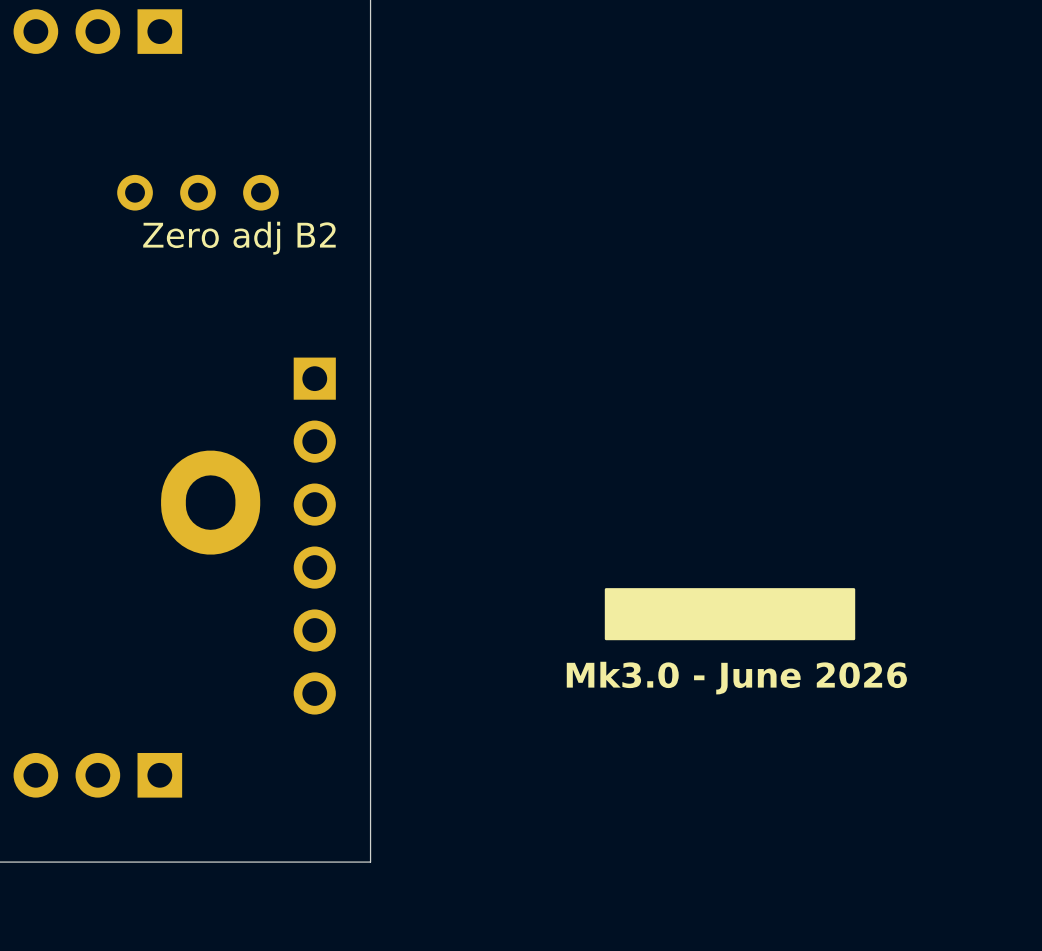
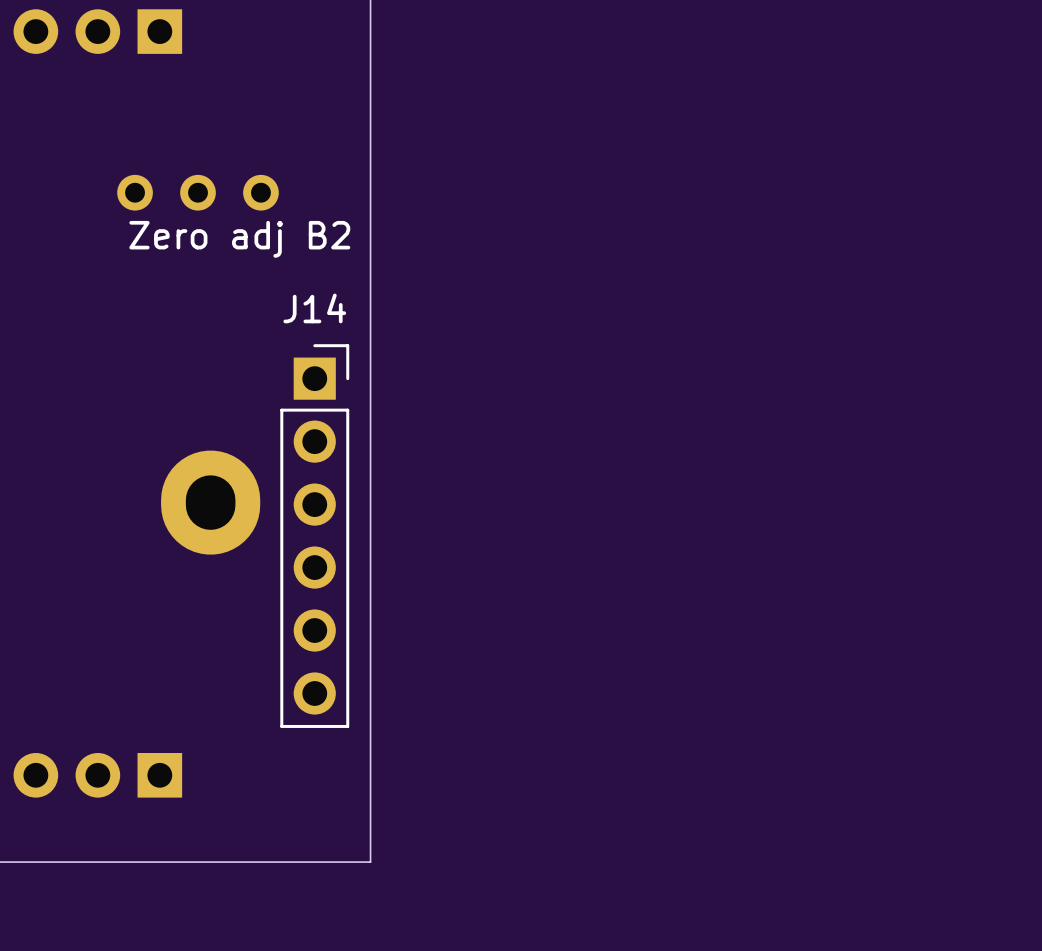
J14 side: top (314, 536) -> bottom (314, 536)
drawing: [604, 588, 856, 641] -> none
text: Mk3.0 - June 2026 (736, 678) -> none

